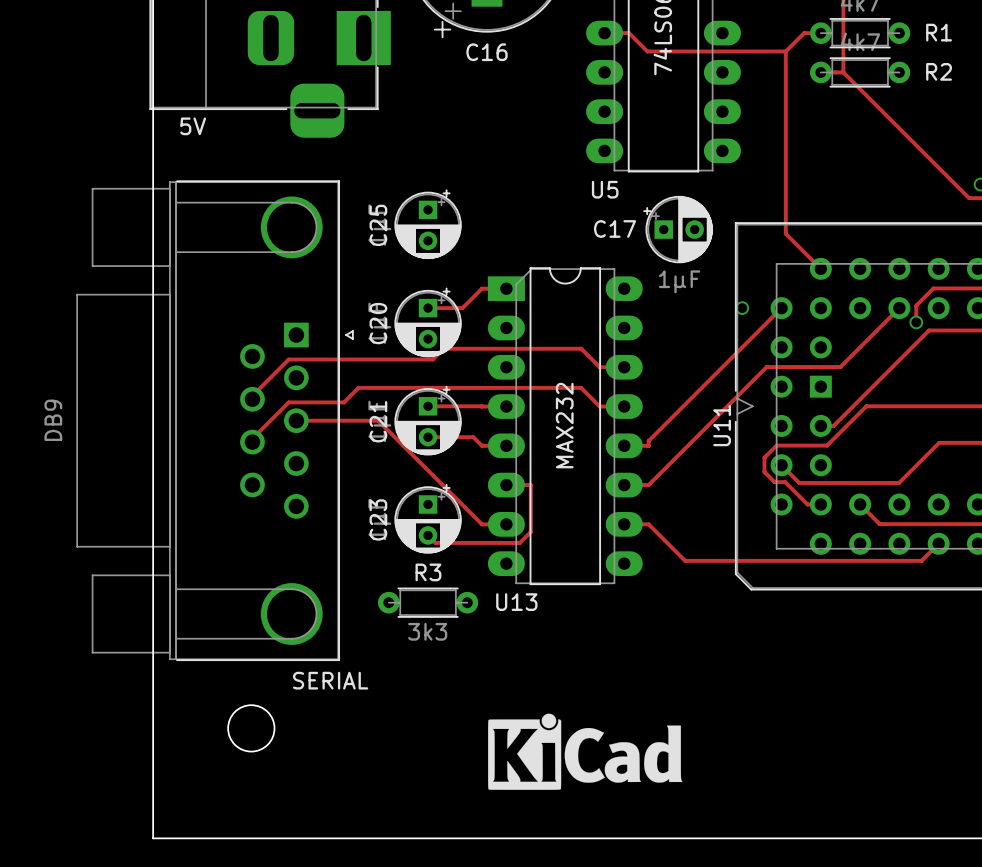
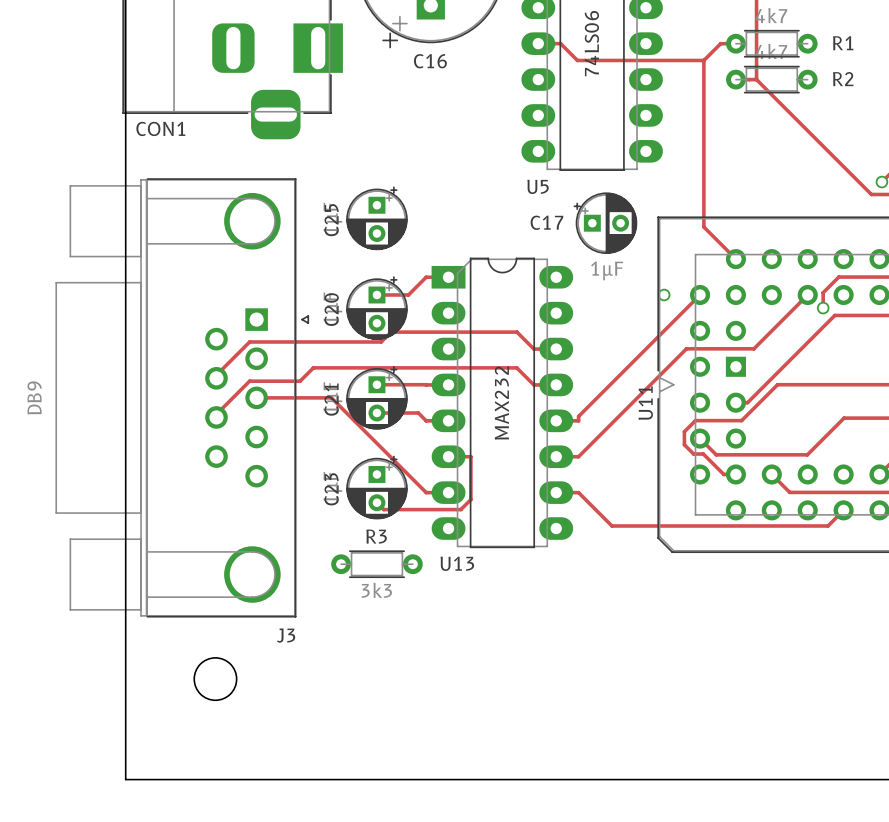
5V name: 5V (193, 126) -> CON1 (160, 128)
SERIAL name: SERIAL (330, 680) -> J3 (286, 635)
drawing: [488, 713, 683, 790] -> none

